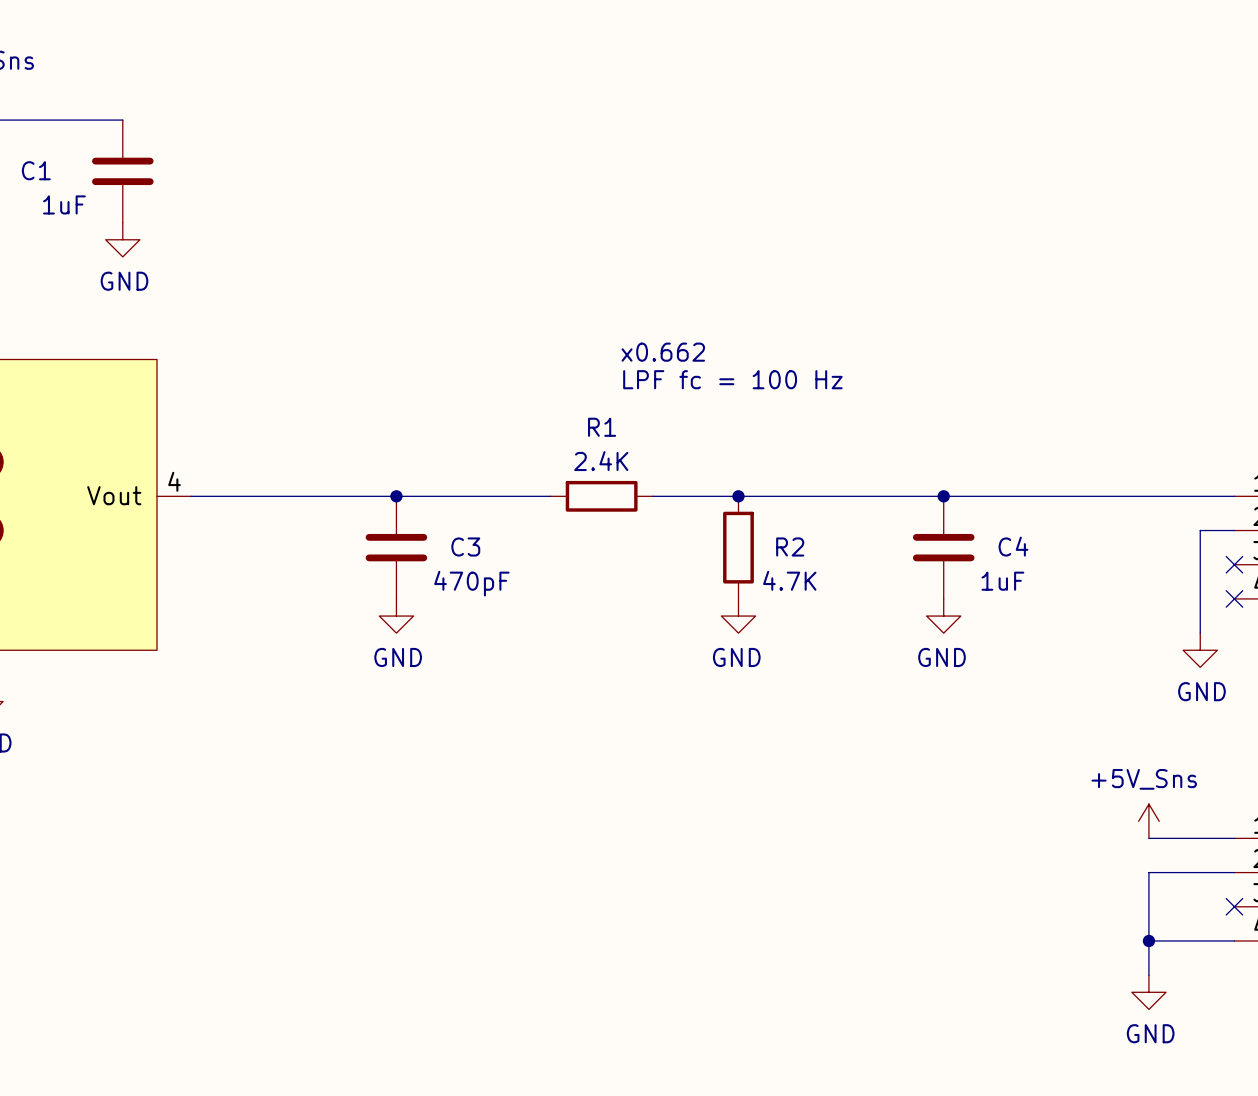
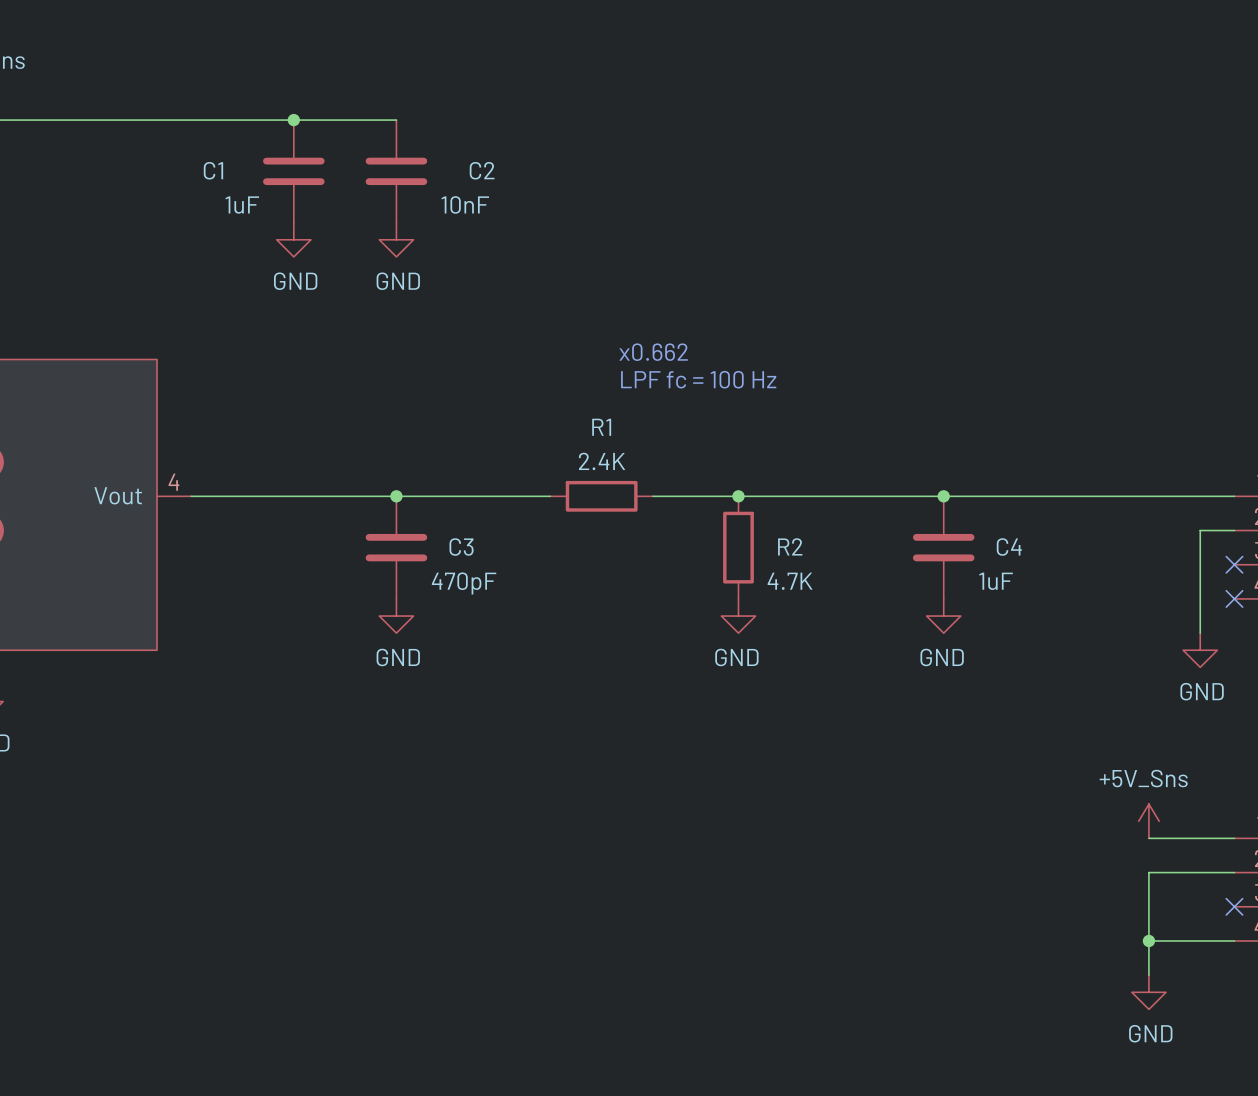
wire: none -> (122, 120) (396, 120)
junction: none -> (293, 120)
C1 position: (122, 171) -> (293, 171)
C2: none -> 10nF (396, 171)
power symbol: GND (122, 239) -> none
power symbol: none -> GND (293, 239)
power symbol: none -> GND (396, 239)

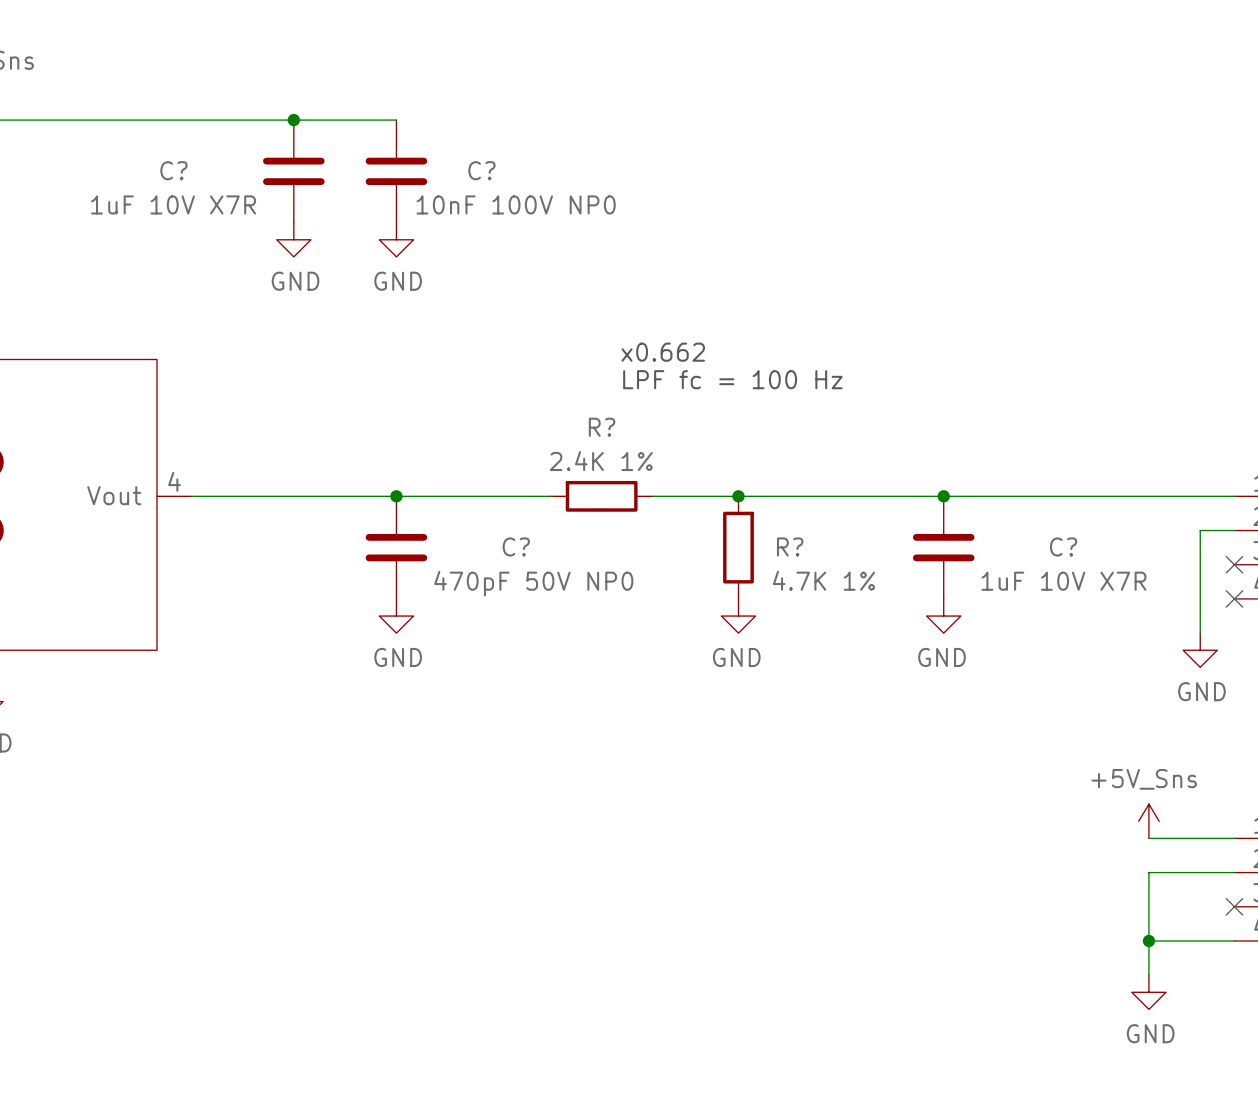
C1 name: C1 (213, 170) -> C? (173, 170)
C2 name: C2 (482, 170) -> C? (481, 170)
C2 value: 10nF (465, 204) -> 10nF 100V NP0 (516, 204)
C1 value: 1uF (242, 205) -> 1uF 10V X7R (173, 204)
R1 name: R1 (601, 427) -> R? (602, 427)
R1 value: 2.4K (602, 461) -> 2.4K 1% (601, 461)
R2 name: R2 (790, 546) -> R? (790, 546)
C3 name: C3 (461, 547) -> C? (516, 546)
C4 name: C4 (1009, 547) -> C? (1063, 546)
R2 value: 4.7K (790, 581) -> 4.7K 1% (823, 580)
C4 value: 1uF (996, 581) -> 1uF 10V X7R (1063, 581)
C3 value: 470pF (464, 583) -> 470pF 50V NP0 (533, 583)

